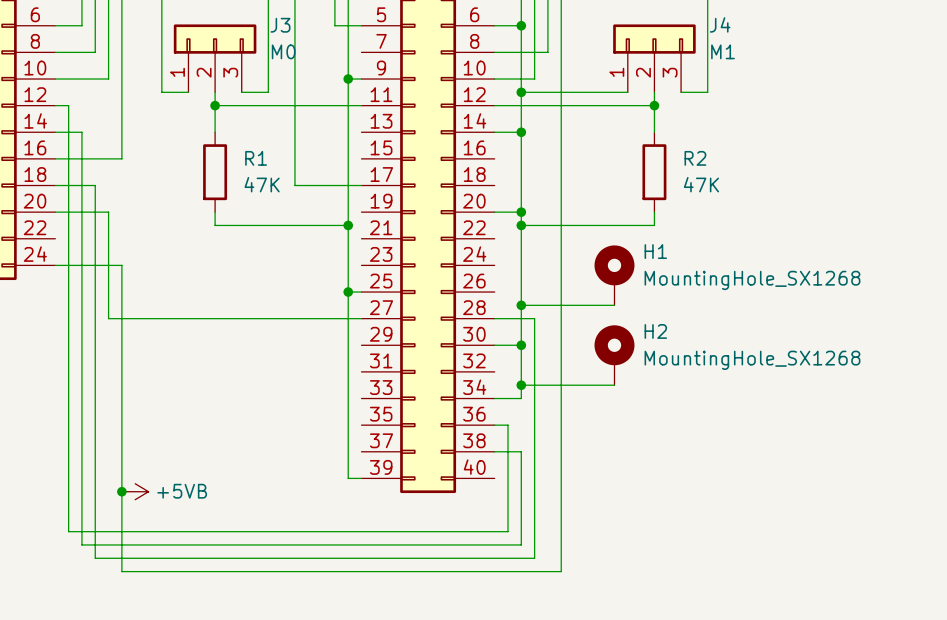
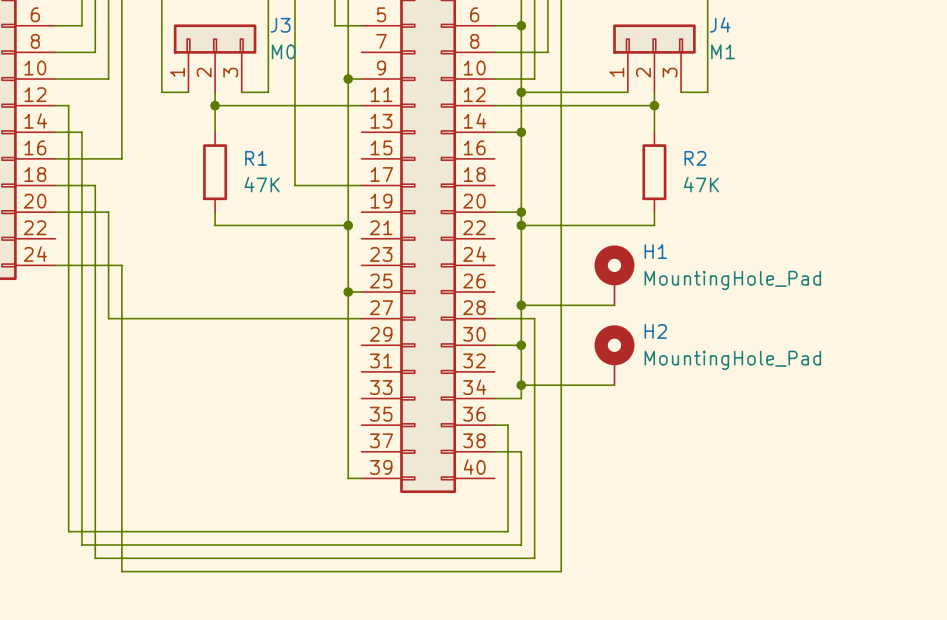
H1 value: MountingHole_SX1268 (752, 280) -> MountingHole_Pad (732, 280)
H2 value: MountingHole_SX1268 (752, 360) -> MountingHole_Pad (732, 360)
junction: (121, 491) -> none
power symbol: +5VB (135, 491) -> none

